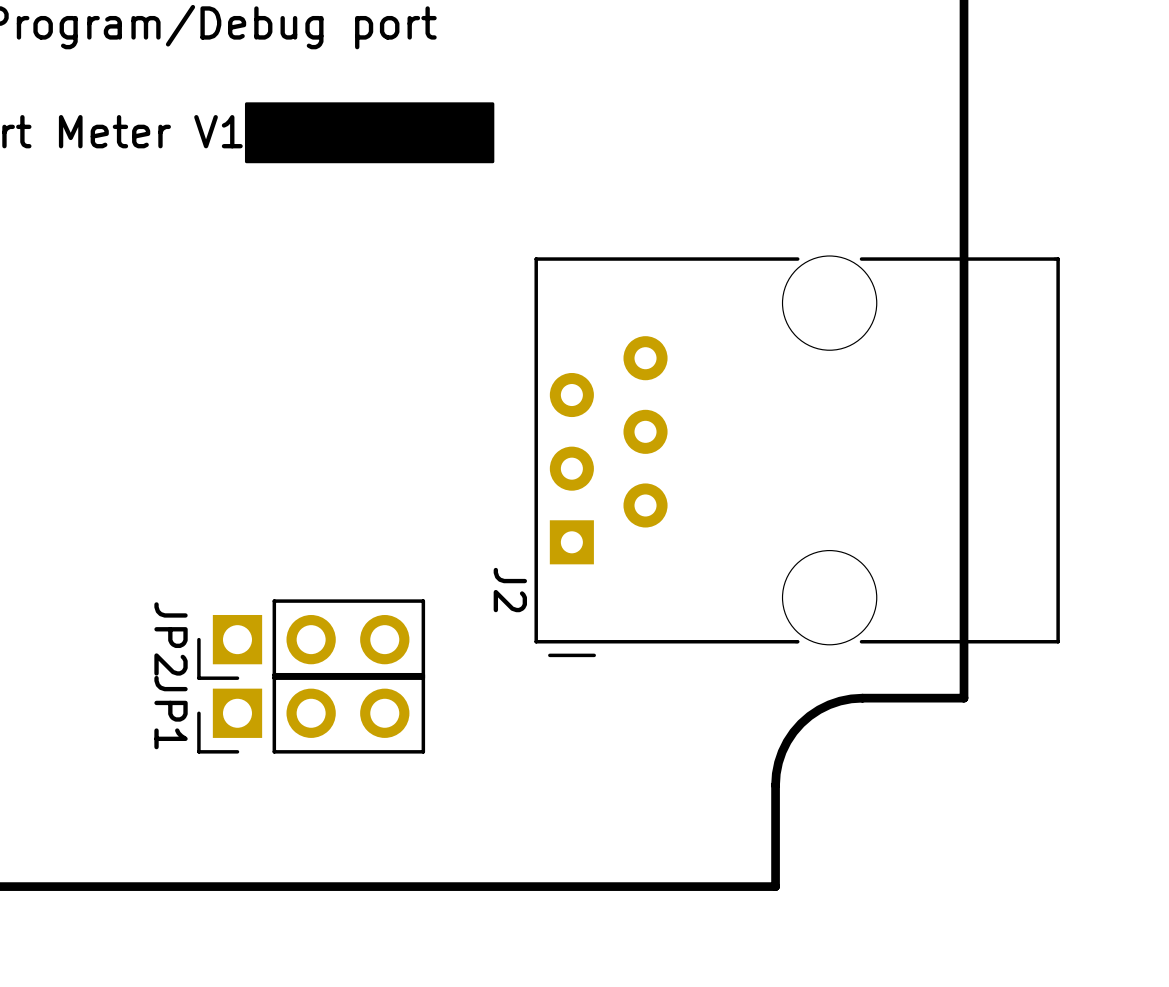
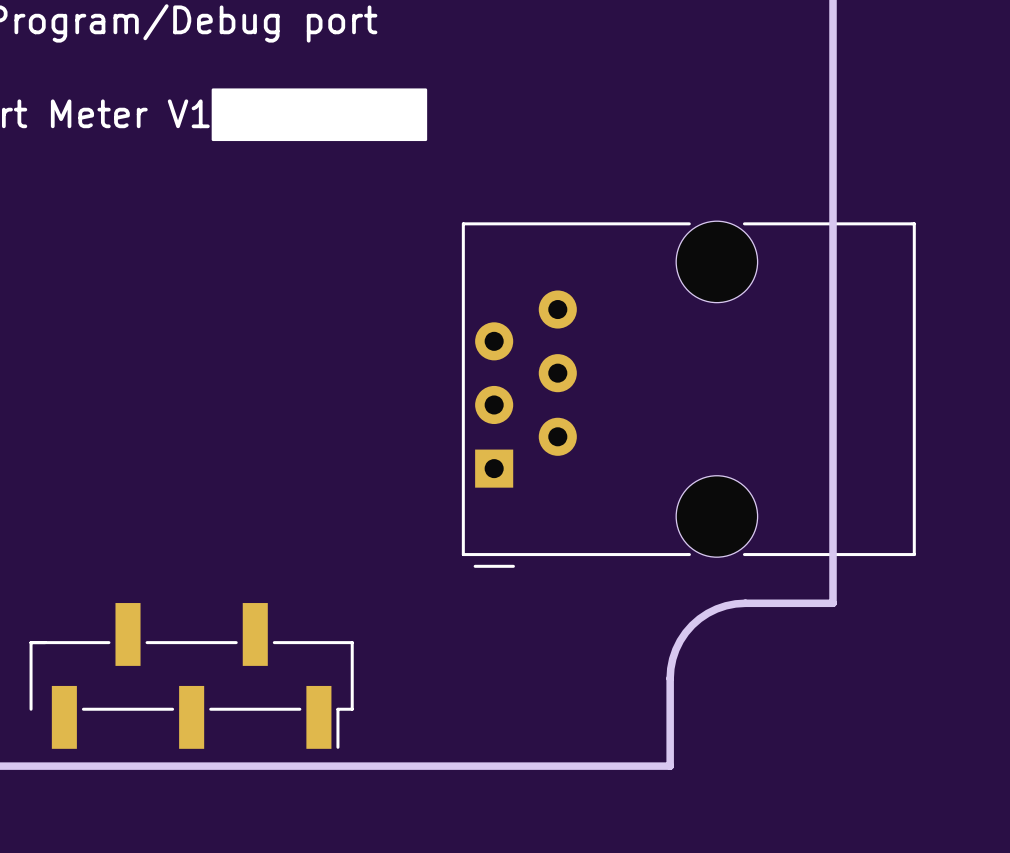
J2 name: J2 (510, 590) -> none
JP2: (311, 639) -> none
JP1: (311, 713) -> none
part: none -> (191, 675)

